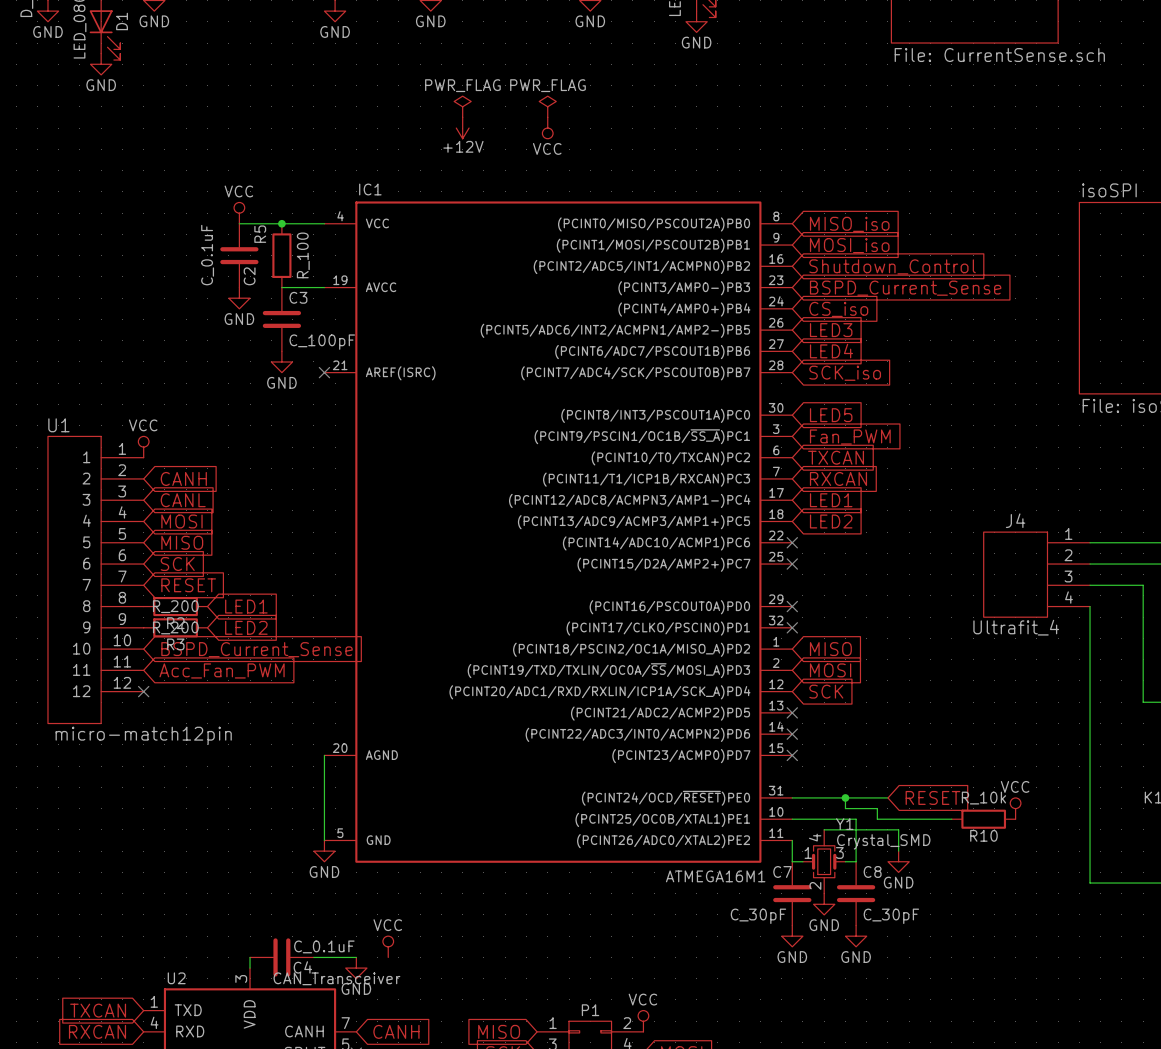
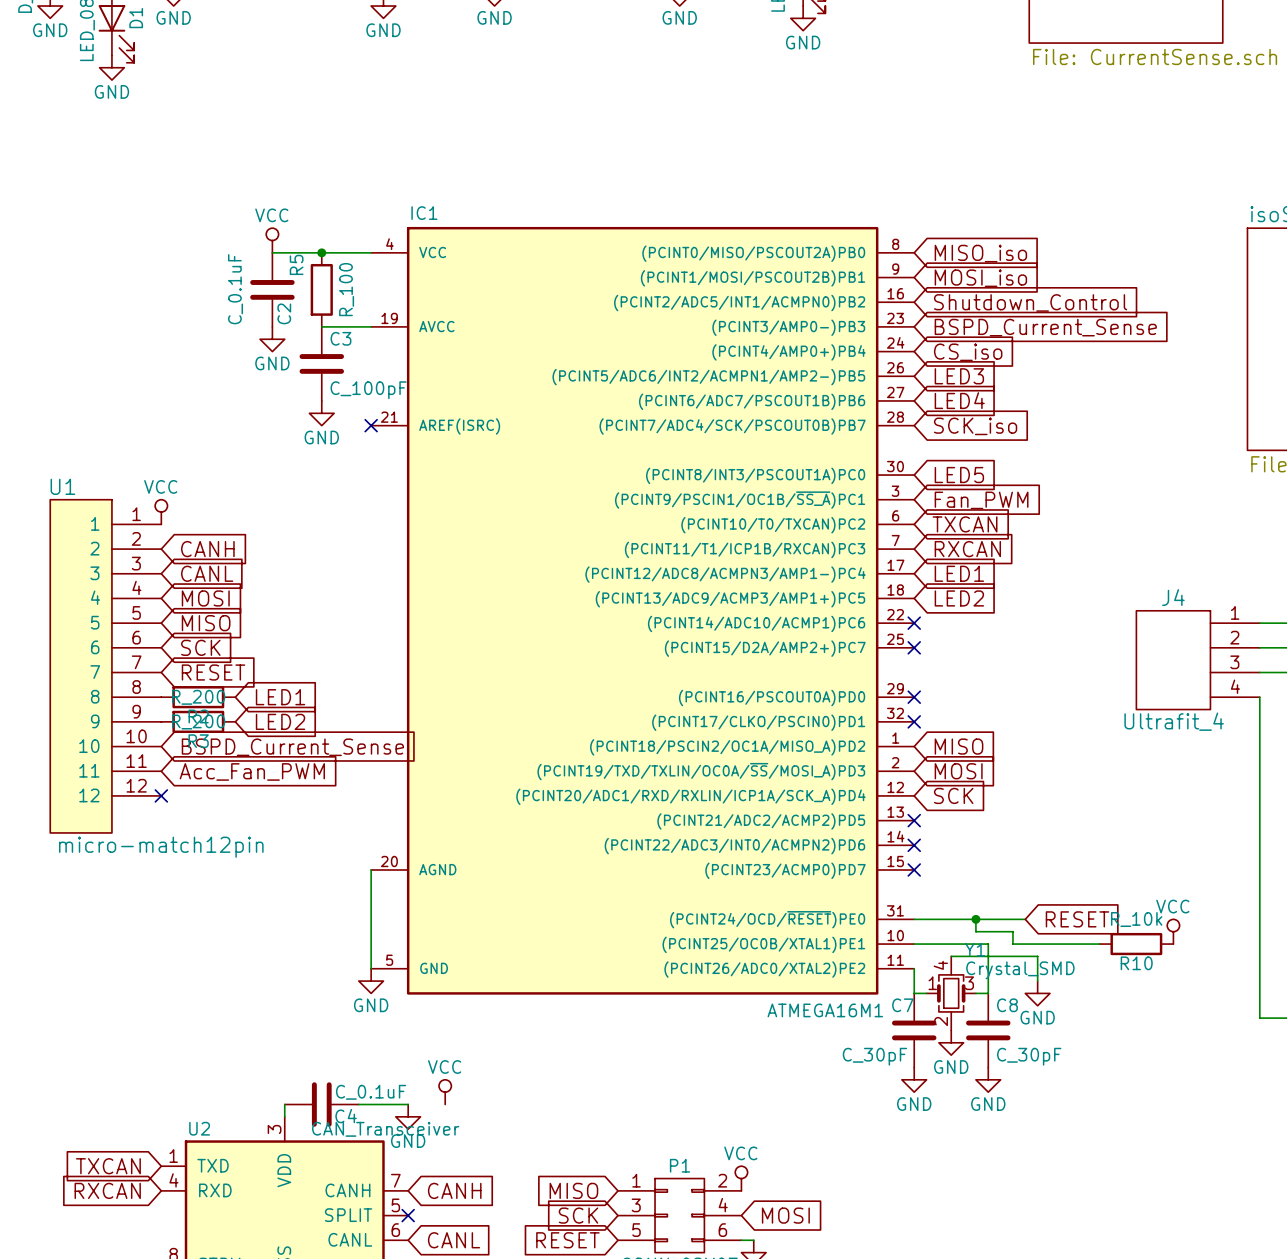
power symbol: PWR_FLAG (462, 106) -> none
power symbol: PWR_FLAG (547, 106) -> none
power symbol: +12V (462, 128) -> none
power symbol: VCC (547, 128) -> none

